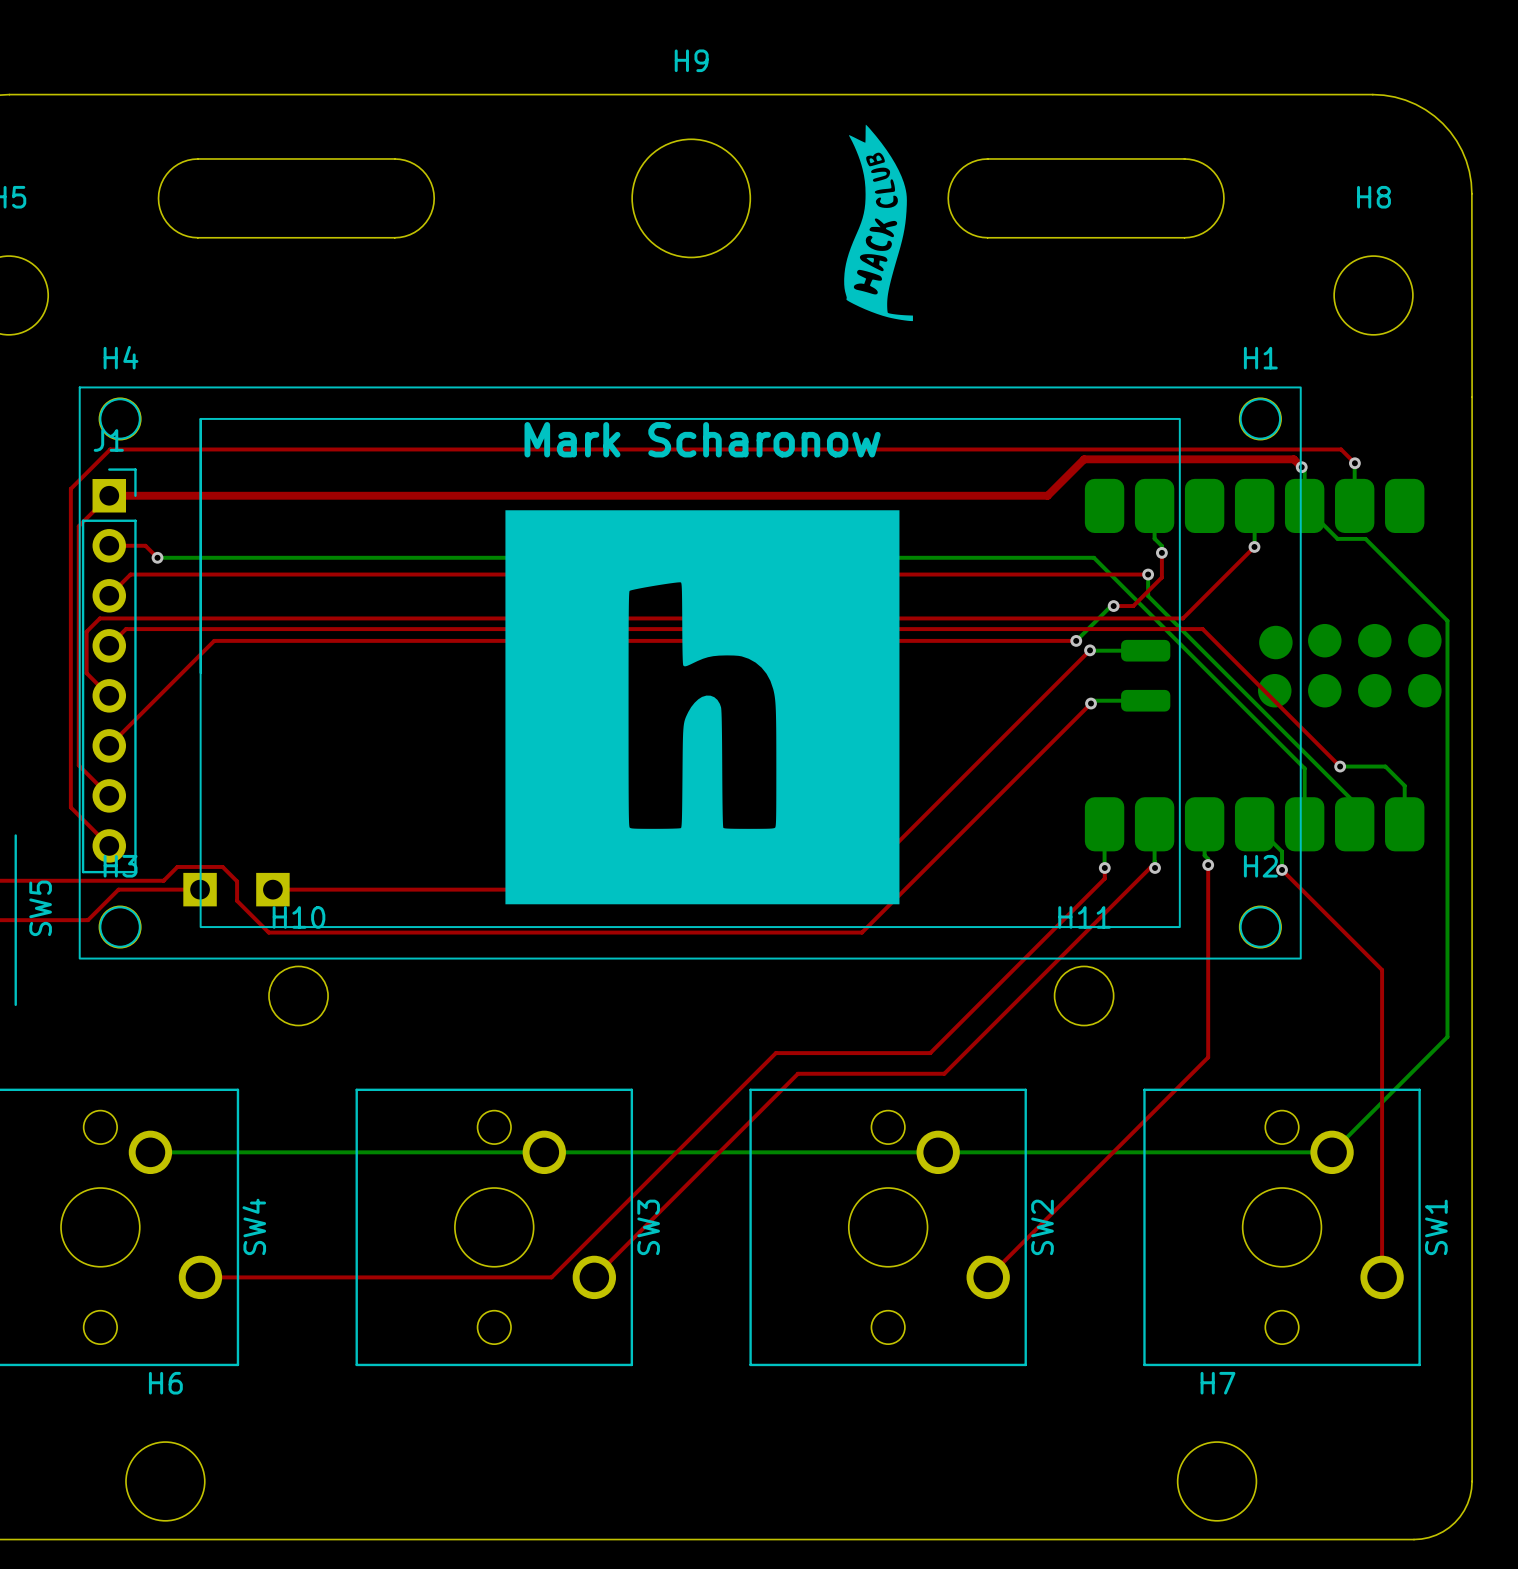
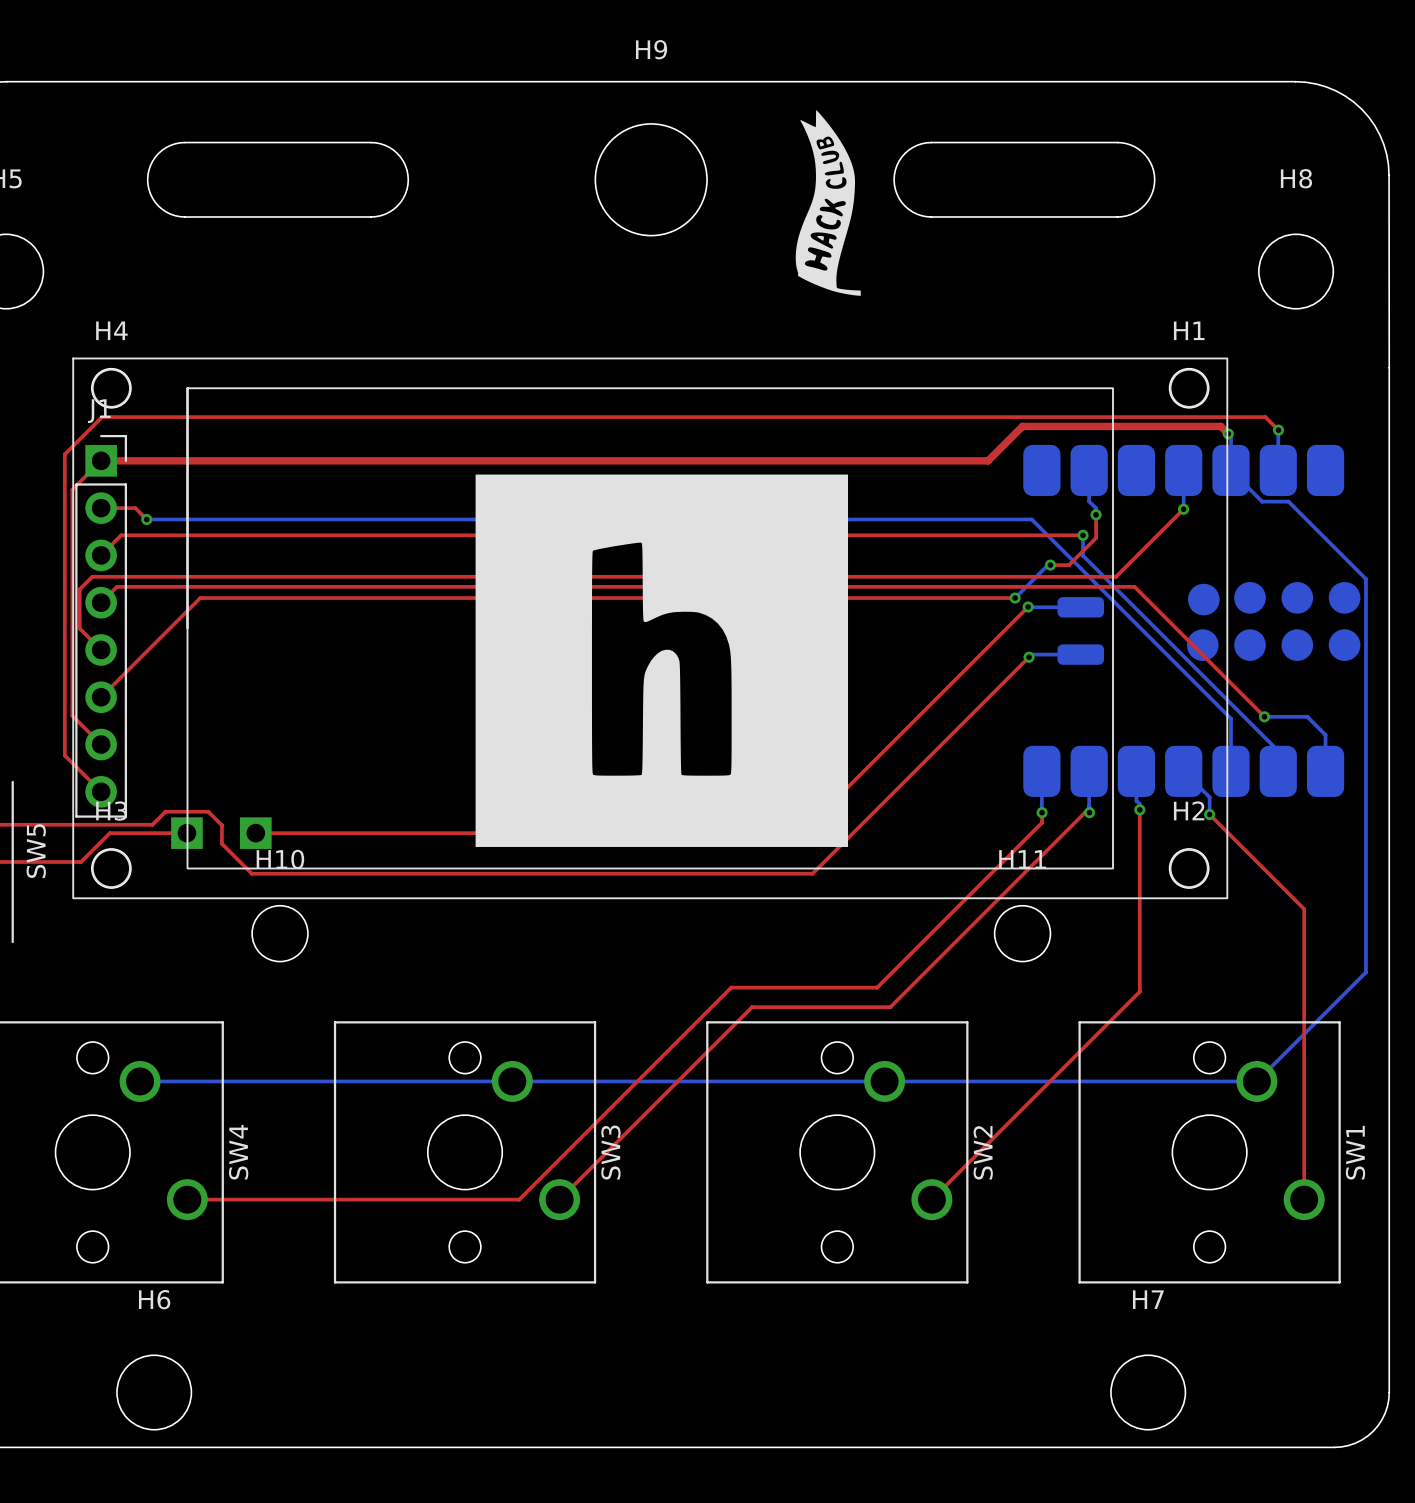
text: Mark Scharonow (702, 439) -> none

